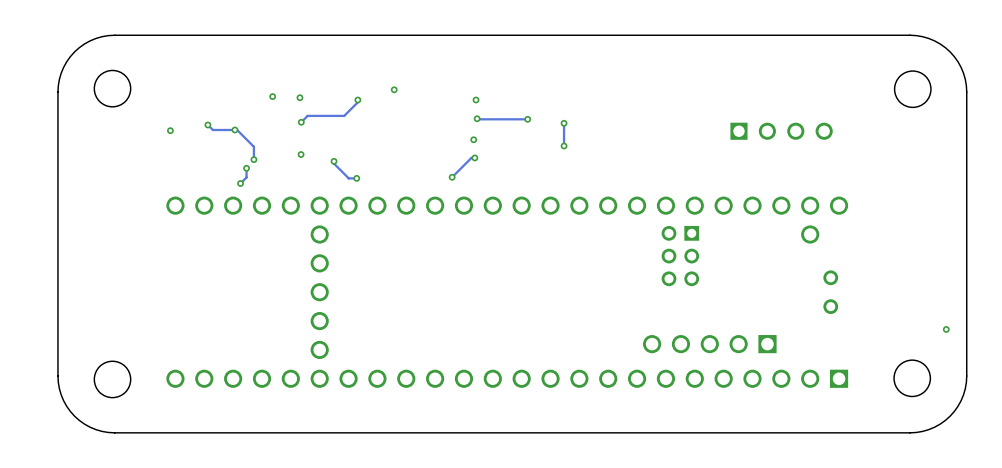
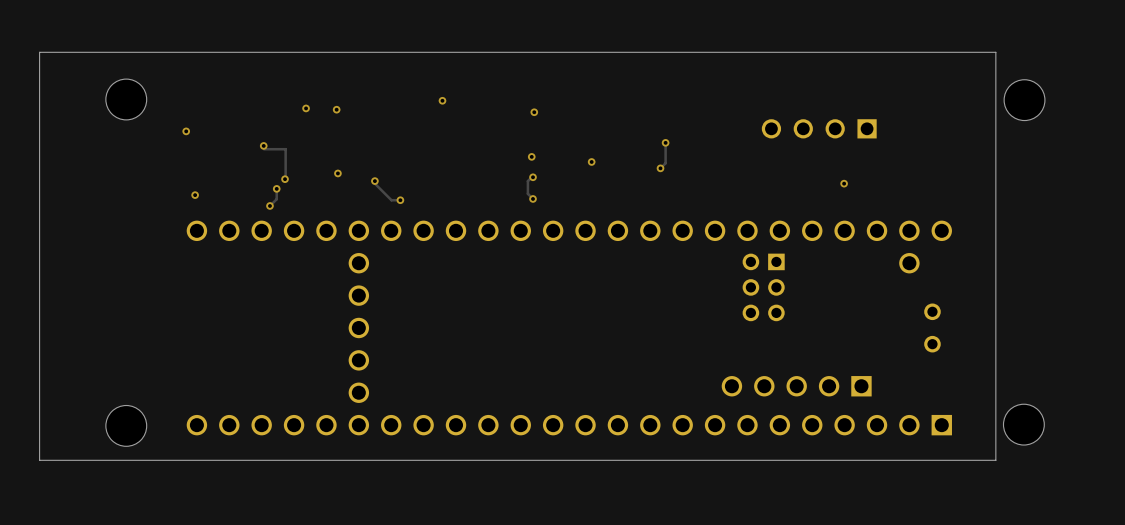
board edge: (909, 35) (114, 35) (90, 40) (70, 56) (63, 67) (58, 85) (57, 376) (63, 400) (74, 416) (84, 424) (96, 429) (114, 432) (909, 432) (934, 427) (950, 416) (958, 406) (966, 382) (966, 85) (961, 67) (945, 47) (928, 38) (909, 35) -> (995, 52) (995, 460) (39, 460) (39, 52) (995, 52)
track: (357, 100) (344, 115) (307, 115) (301, 122) -> none
via: (357, 100) -> none
track: (477, 118) (527, 119) -> none
via: (477, 118) -> none
via: (527, 119) -> none
via: (301, 122) -> none
track: (564, 123) (564, 146) -> none
via: (564, 123) -> none
track: (207, 125) (212, 129) (237, 129) (253, 146) (253, 159) -> none
via: (207, 125) -> none
track: none -> (665, 142) (665, 163) (660, 168)
via: none -> (665, 142)
via position: (170, 130) -> (186, 131)
part rotation: 0° (781, 131) -> 180° (819, 128)
track: none -> (263, 149) (285, 149) (285, 176)
via: none -> (591, 161)
via: (564, 146) -> none
via: none -> (660, 168)
track: (473, 157) (471, 157) (452, 177) -> (531, 177) (527, 181) (527, 193) (533, 198)
via: none -> (844, 183)
via: none -> (195, 195)
via position: (452, 177) -> (533, 198)
via: (946, 329) -> none

